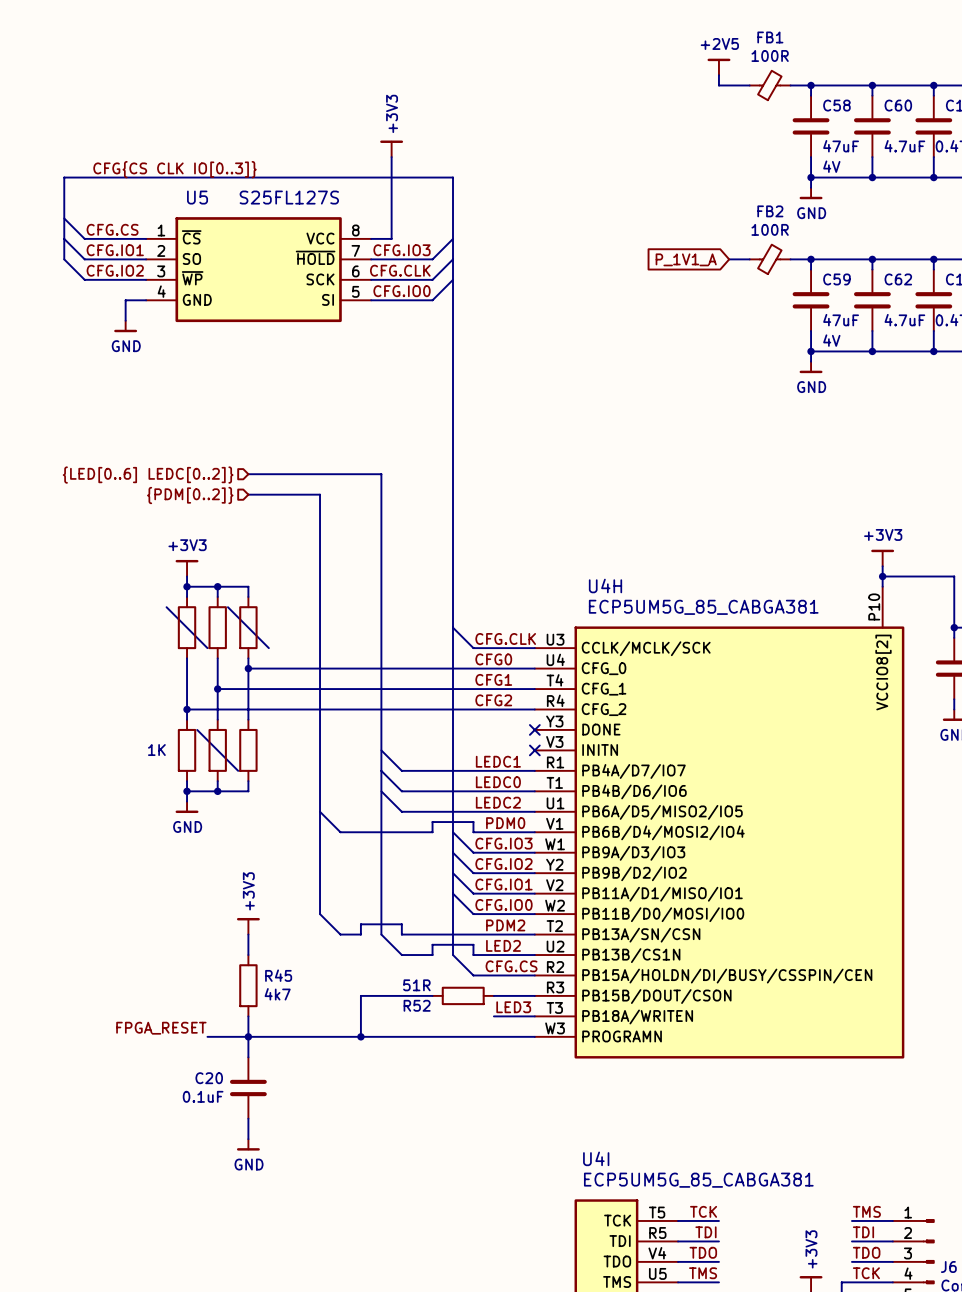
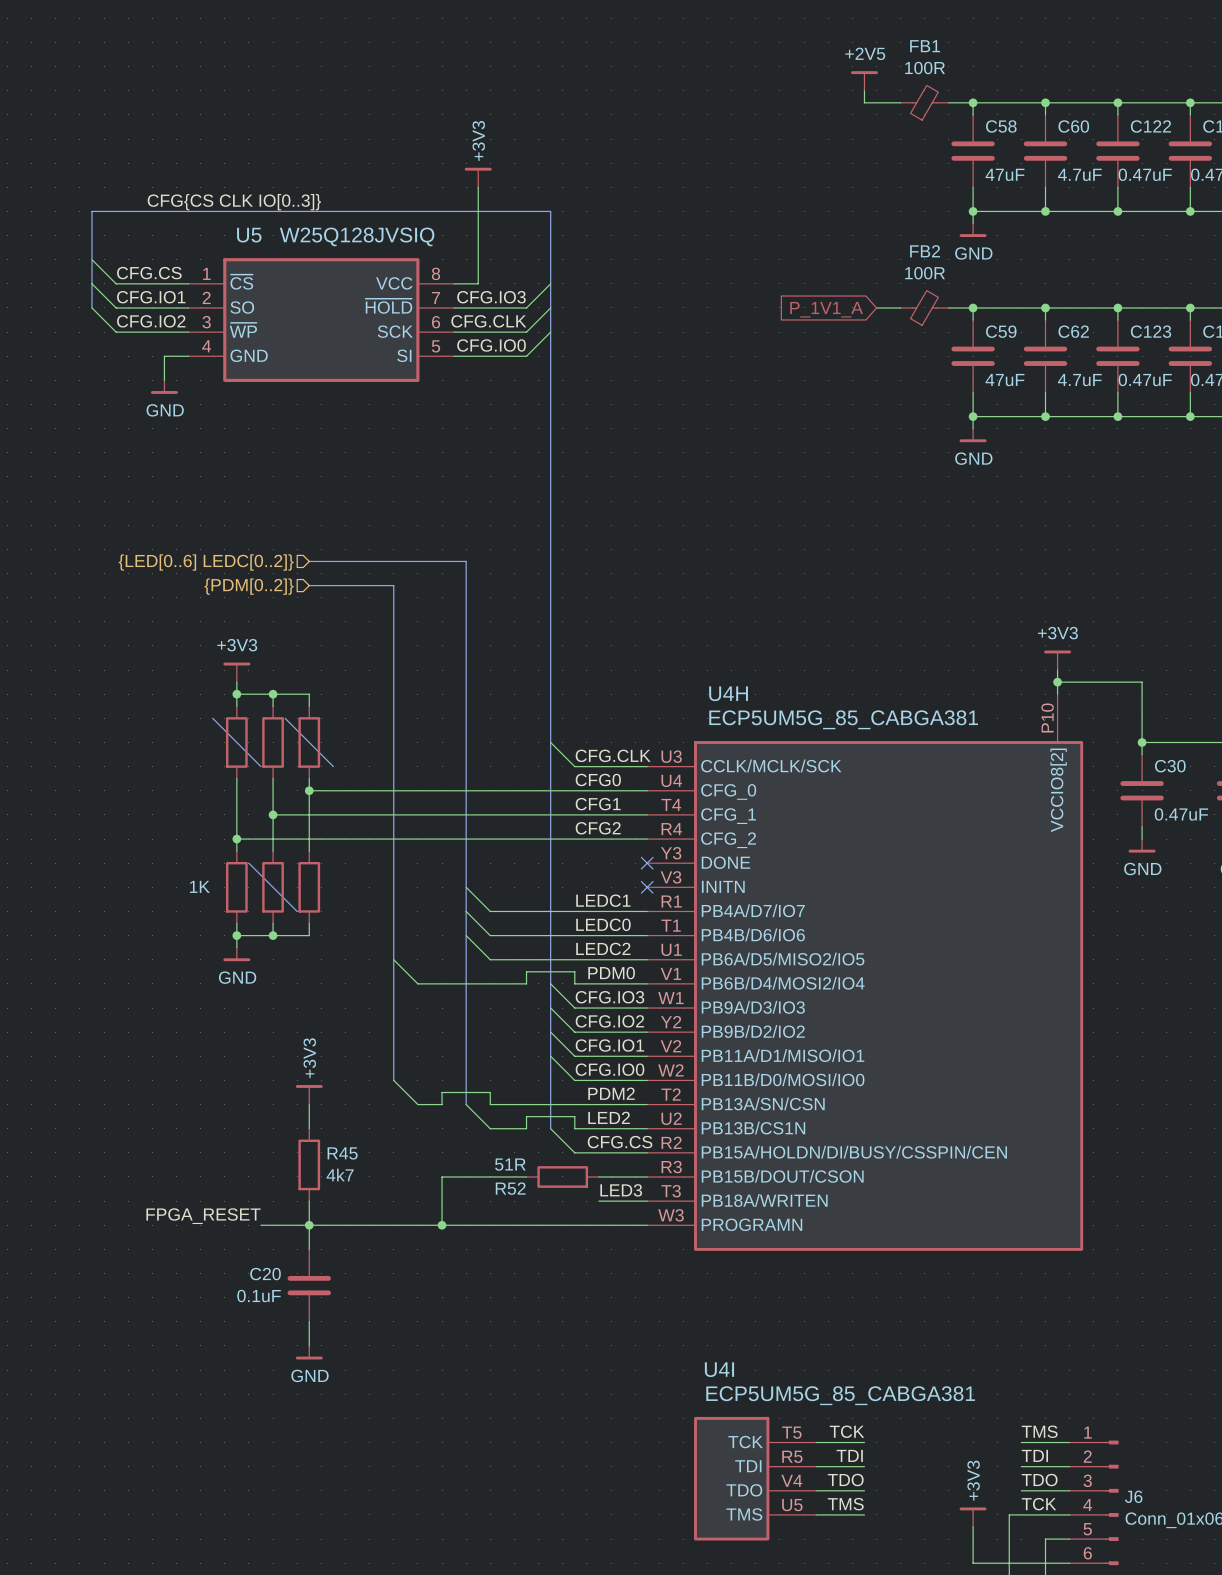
C58 text: 4V (831, 166) -> none
U5 value: S25FL127S (289, 197) -> W25Q128JVSIQ (357, 236)
C59 text: 4V (831, 340) -> none

